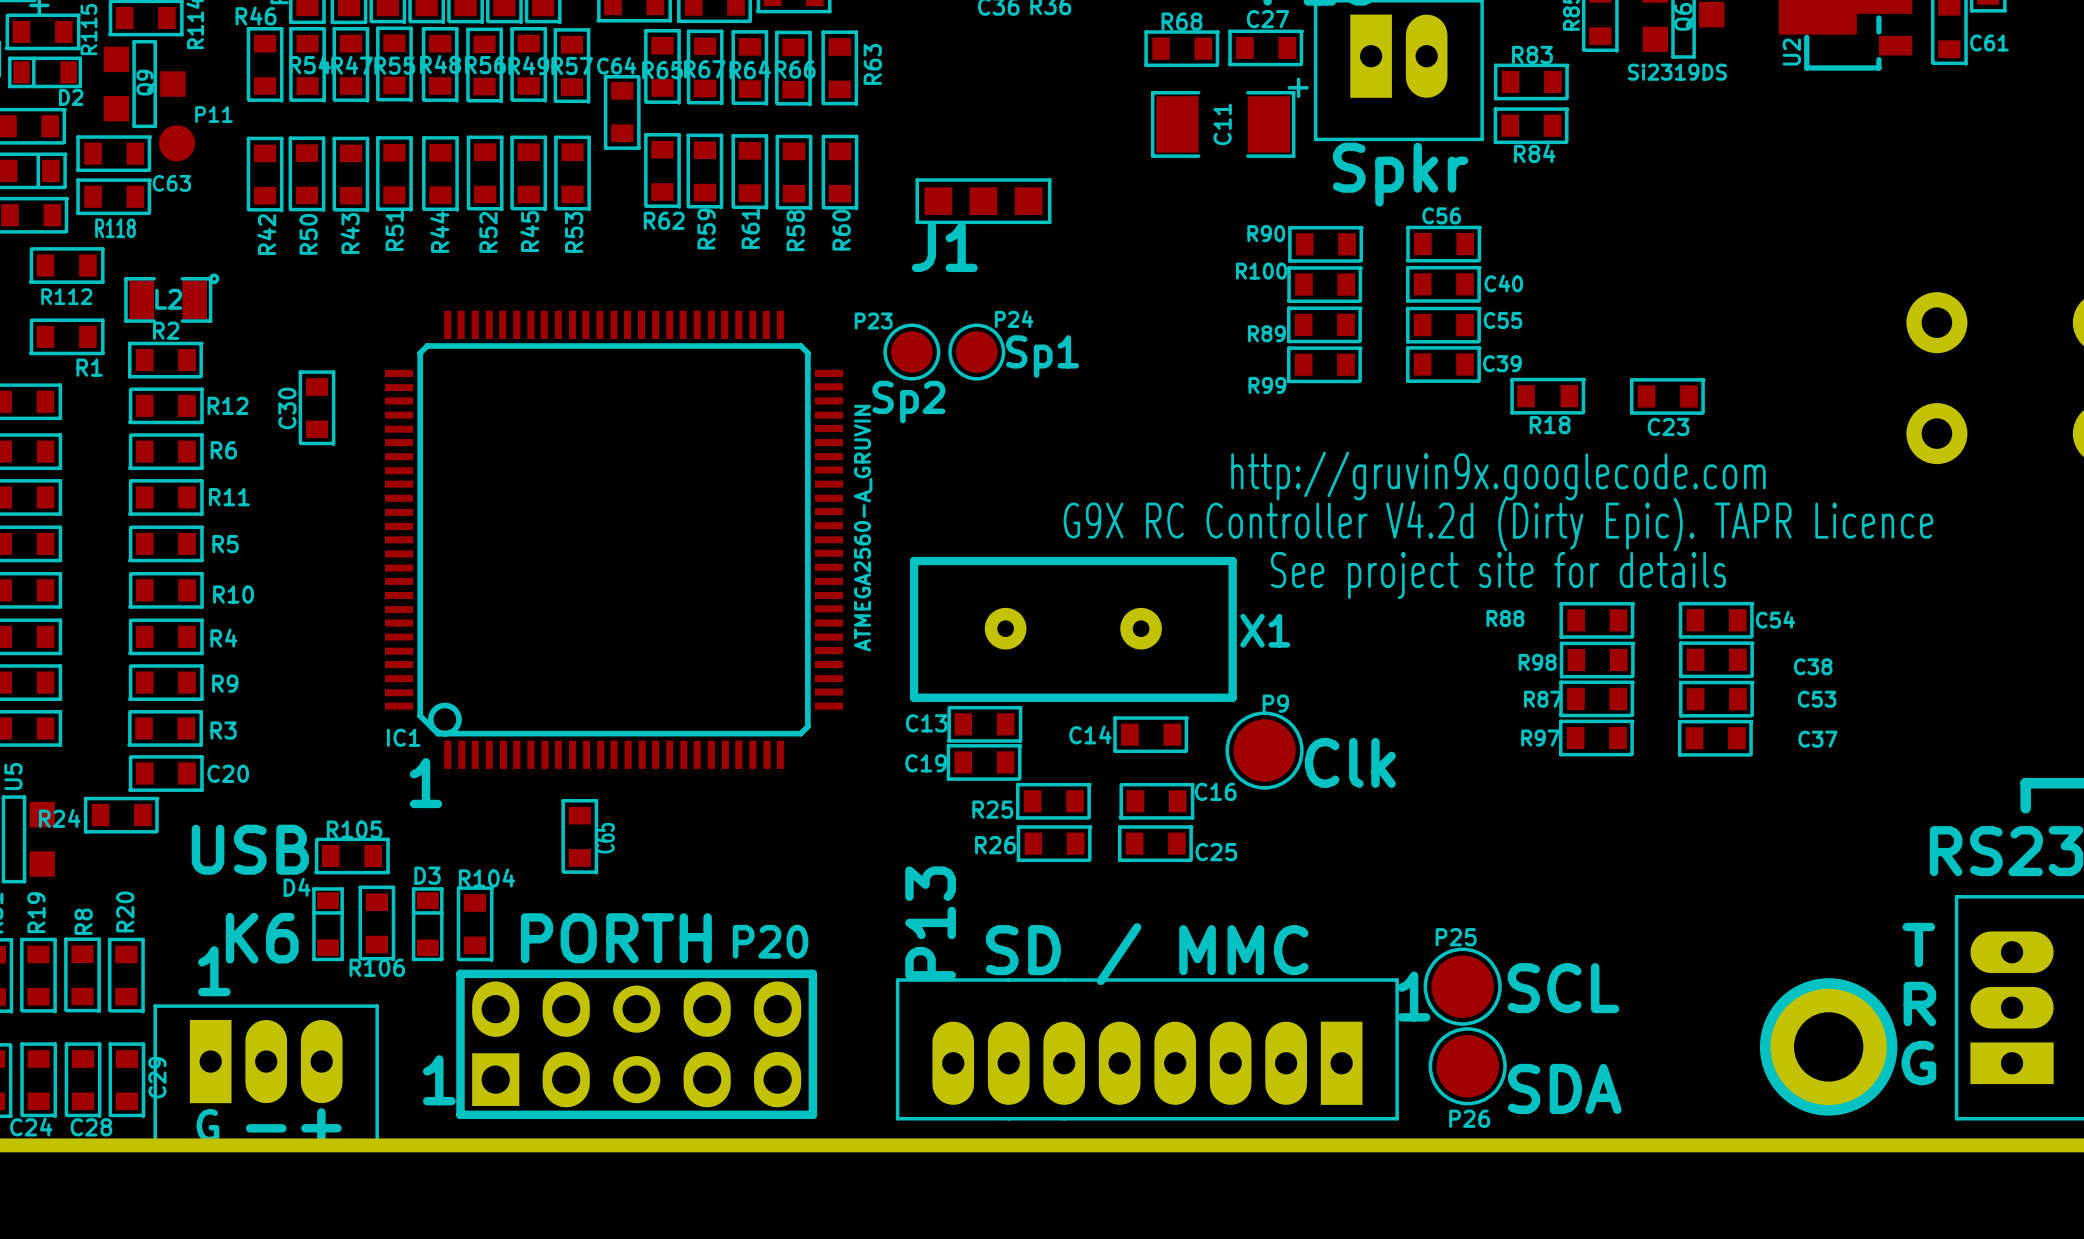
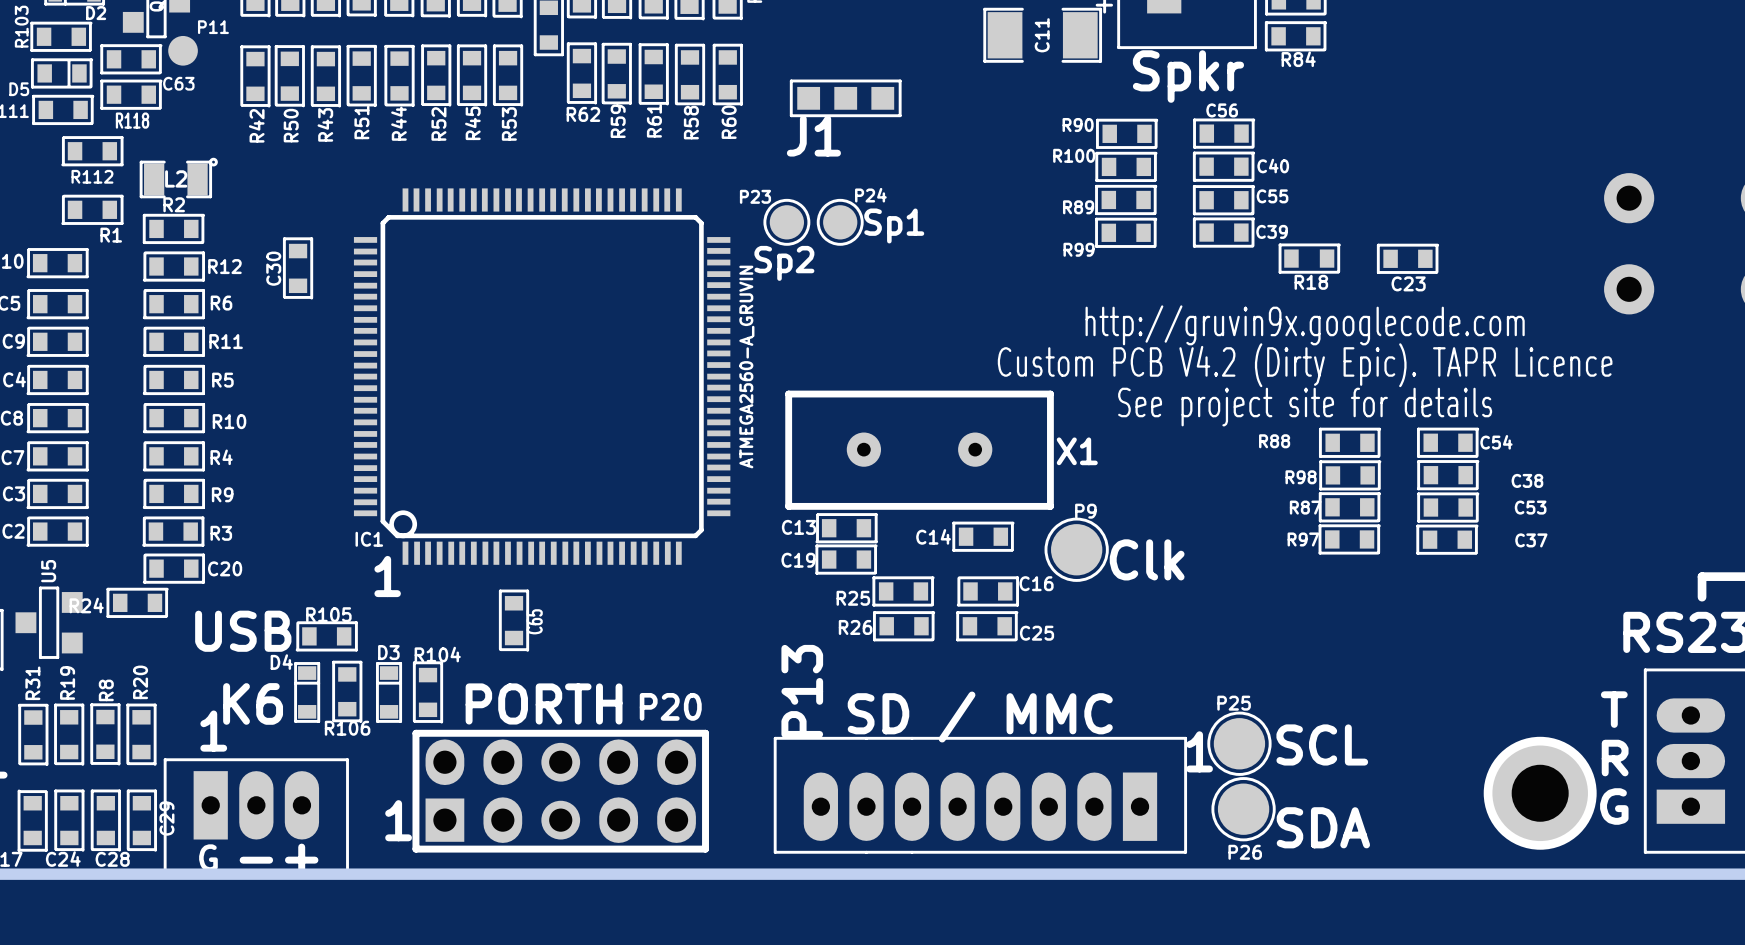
text position: http://gruvin9x.googlecode.com (1498, 476) -> http://gruvin9x.googlecode.com (1305, 325)
text: G9X RC Controller V4.2d (Dirty Epic). TAPR Licence (1498, 524) -> Custom PCB V4.2 (Dirty Epic). TAPR Licence (1305, 365)
text position: See project site for details (1498, 575) -> See project site for details (1305, 407)

